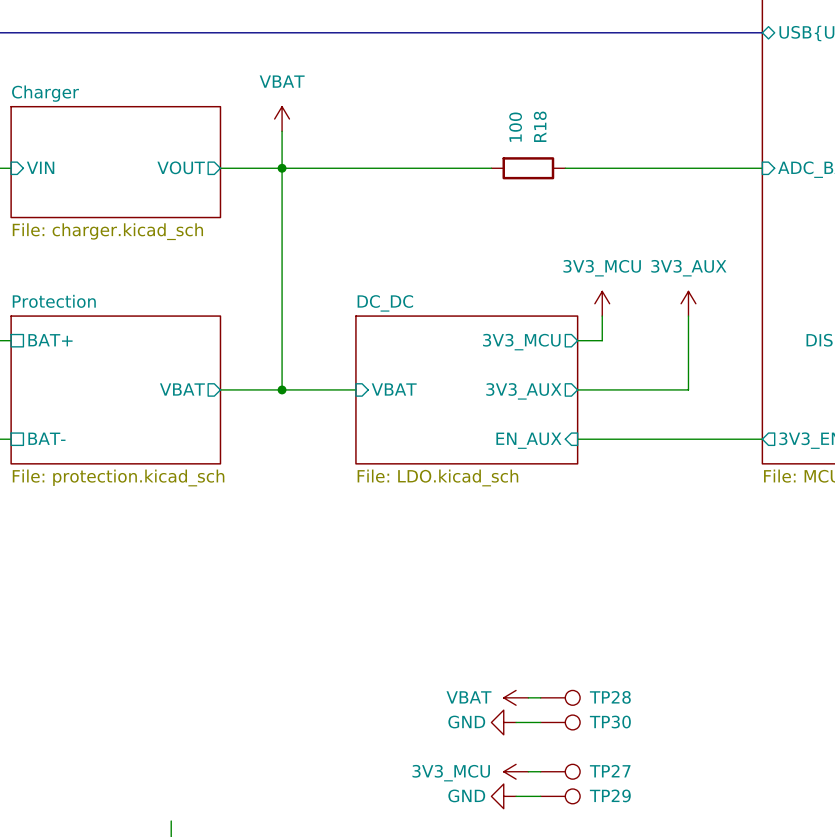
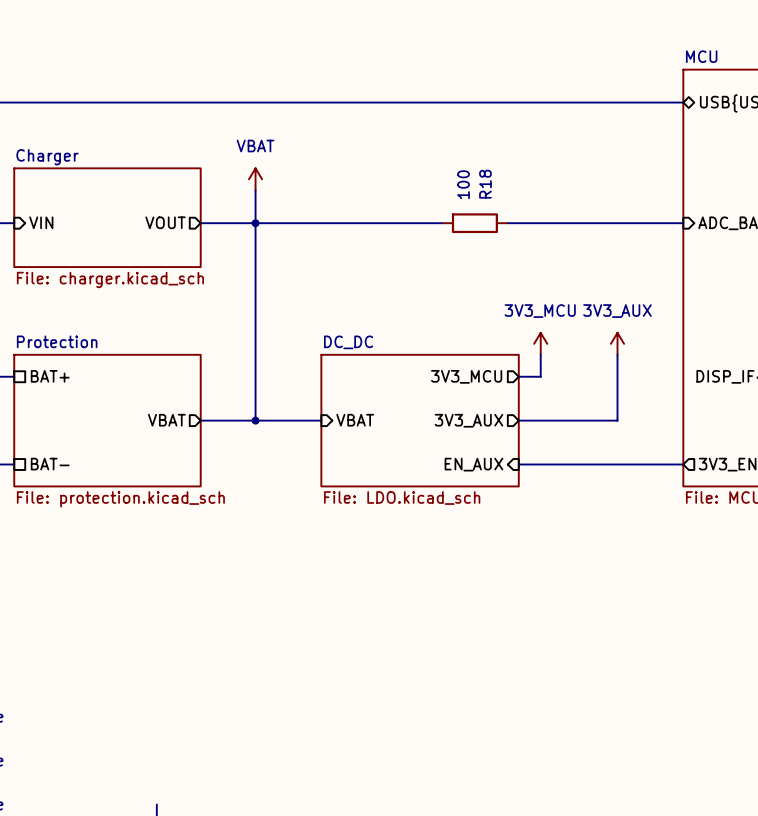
power symbol: VBAT (516, 697) -> none
wire: (528, 697) (540, 697) -> none
TP28: (560, 697) -> none
power symbol: GND (503, 722) -> none
wire: (516, 722) (540, 722) -> none
TP30: (560, 722) -> none
power symbol: 3V3_MCU (516, 771) -> none
wire: (528, 771) (540, 771) -> none
TP27: (560, 771) -> none
power symbol: GND (503, 796) -> none
wire: (516, 796) (540, 796) -> none
TP29: (560, 796) -> none

